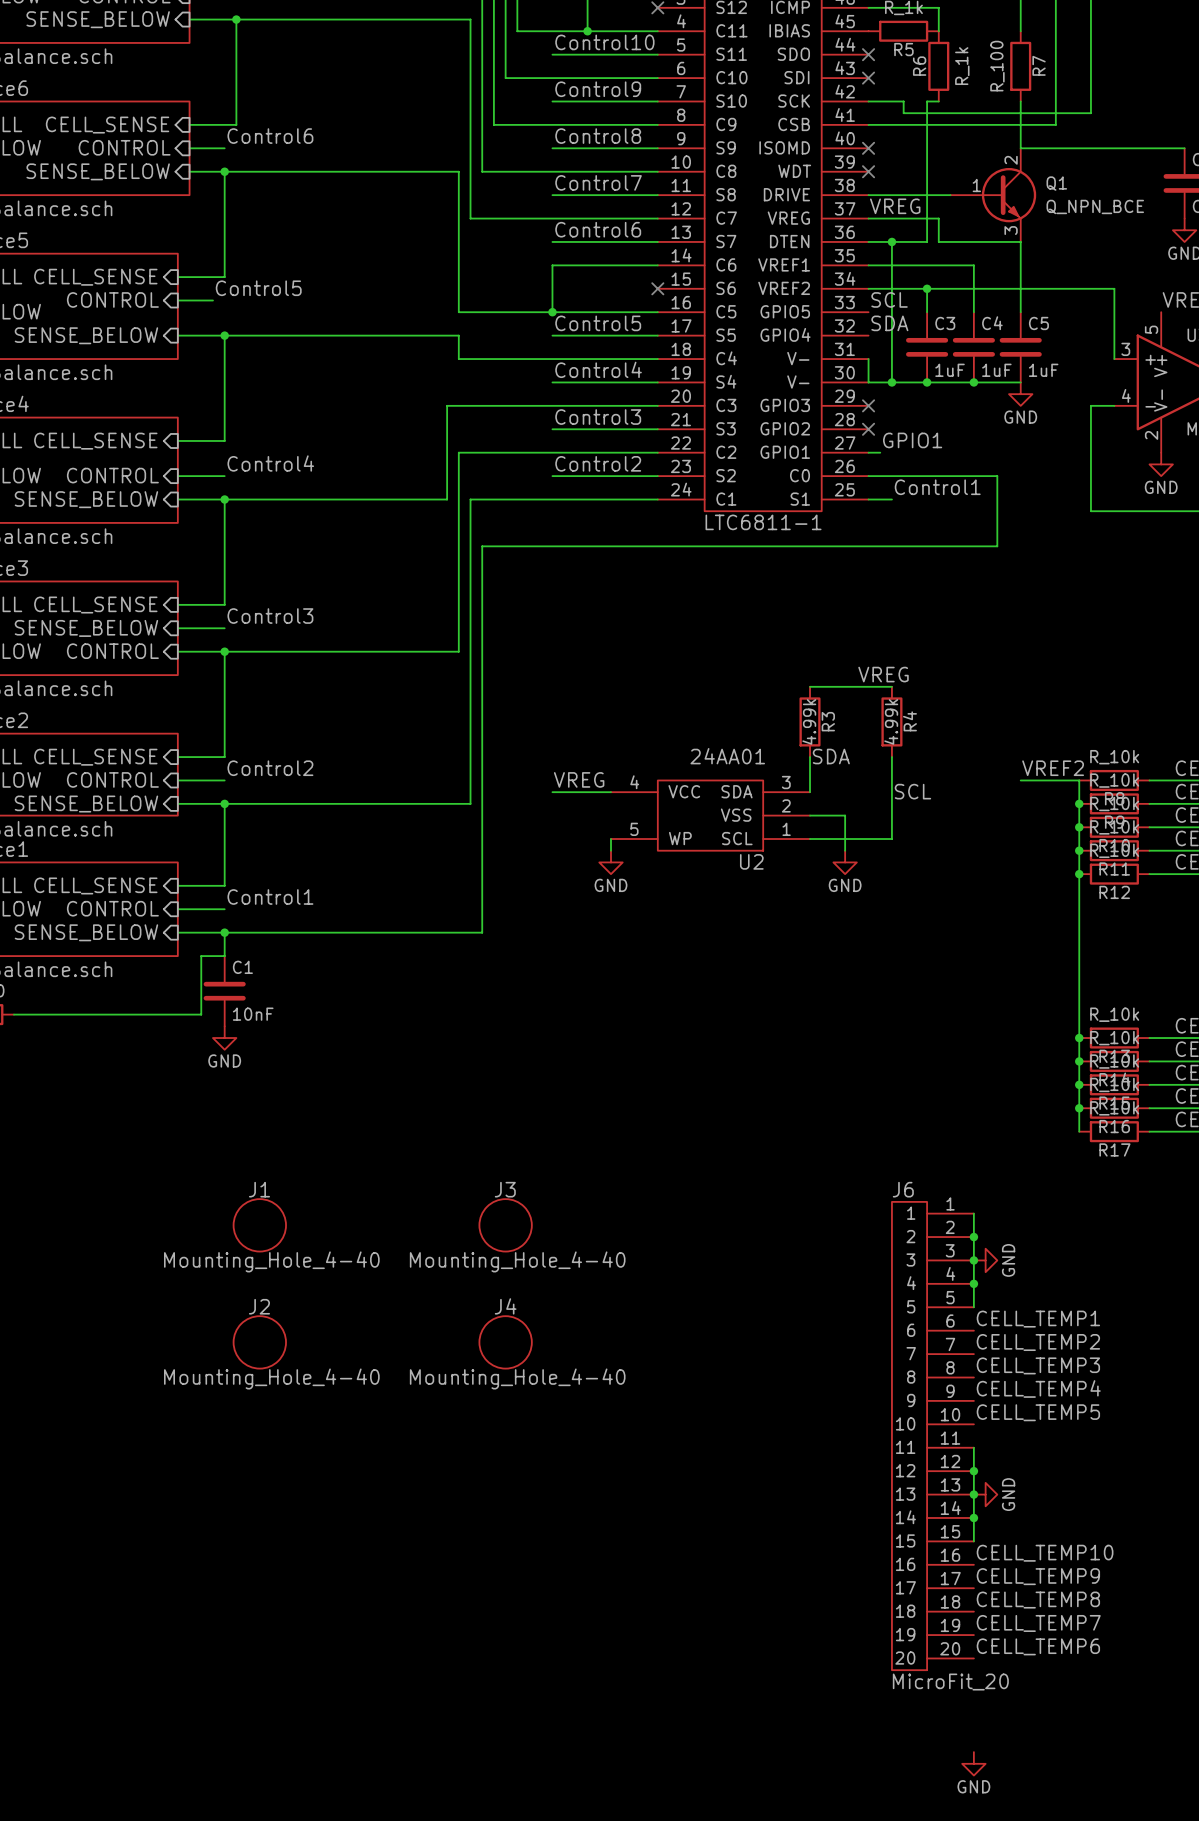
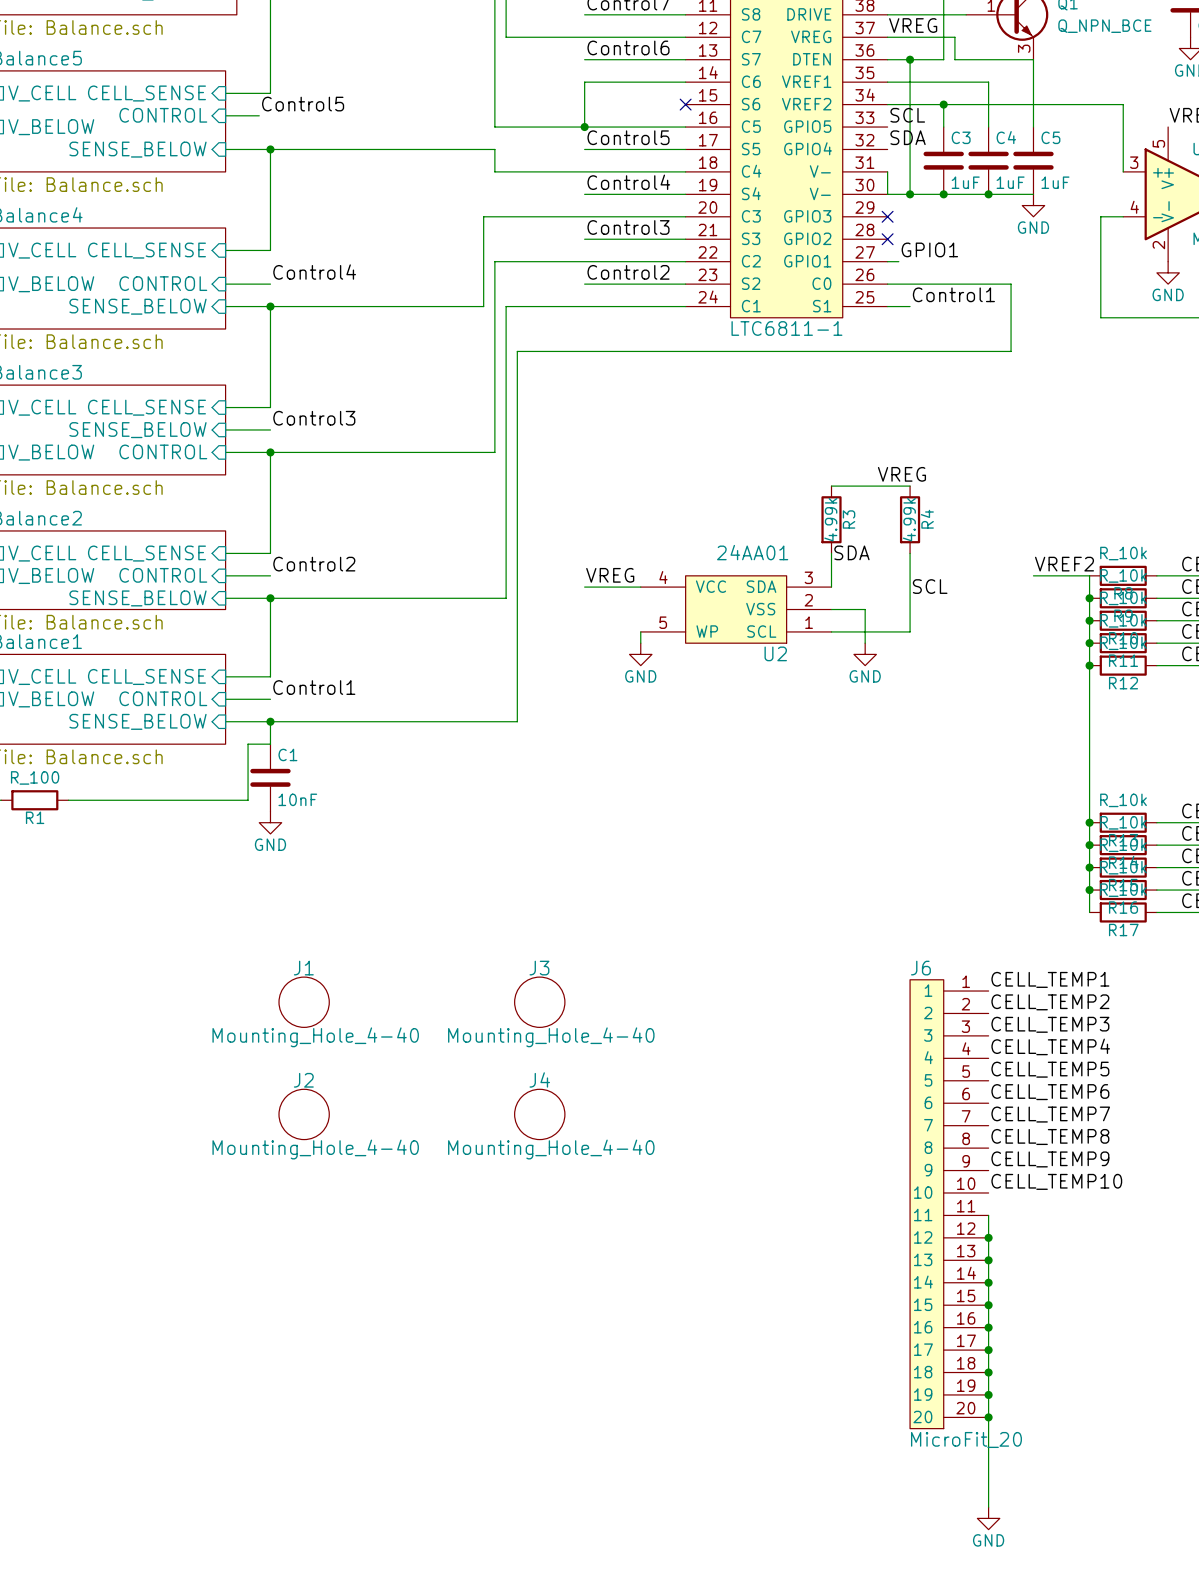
label: none -> CELL_TEMP1 (1050, 979)
wire: (973, 1213) (973, 1307) -> none
label: none -> CELL_TEMP2 (1050, 1002)
junction: (973, 1237) -> none
label: none -> CELL_TEMP3 (1050, 1024)
junction: (973, 1260) -> none
power symbol: GND (985, 1260) -> none
label: none -> CELL_TEMP4 (1050, 1046)
junction: (973, 1283) -> none
label: none -> CELL_TEMP5 (1050, 1069)
label: CELL_TEMP1 (1038, 1319) -> CELL_TEMP6 (1050, 1092)
label: CELL_TEMP2 (1038, 1342) -> CELL_TEMP7 (1050, 1114)
label: CELL_TEMP3 (1038, 1365) -> CELL_TEMP8 (1050, 1137)
label: CELL_TEMP4 (1038, 1389) -> CELL_TEMP9 (1050, 1159)
label: CELL_TEMP5 (1038, 1412) -> CELL_TEMP10 (1056, 1181)
power symbol: GND (985, 1494) -> none
wire: none -> (988, 1305) (988, 1507)
junction: none -> (988, 1305)
label: CELL_TEMP10 (1045, 1553) -> none
junction: none -> (988, 1327)
label: CELL_TEMP9 (1038, 1576) -> none
junction: none -> (988, 1350)
label: CELL_TEMP8 (1038, 1600) -> none
junction: none -> (988, 1372)
label: CELL_TEMP7 (1038, 1623) -> none
junction: none -> (988, 1394)
label: CELL_TEMP6 (1038, 1646) -> none
junction: none -> (988, 1417)

